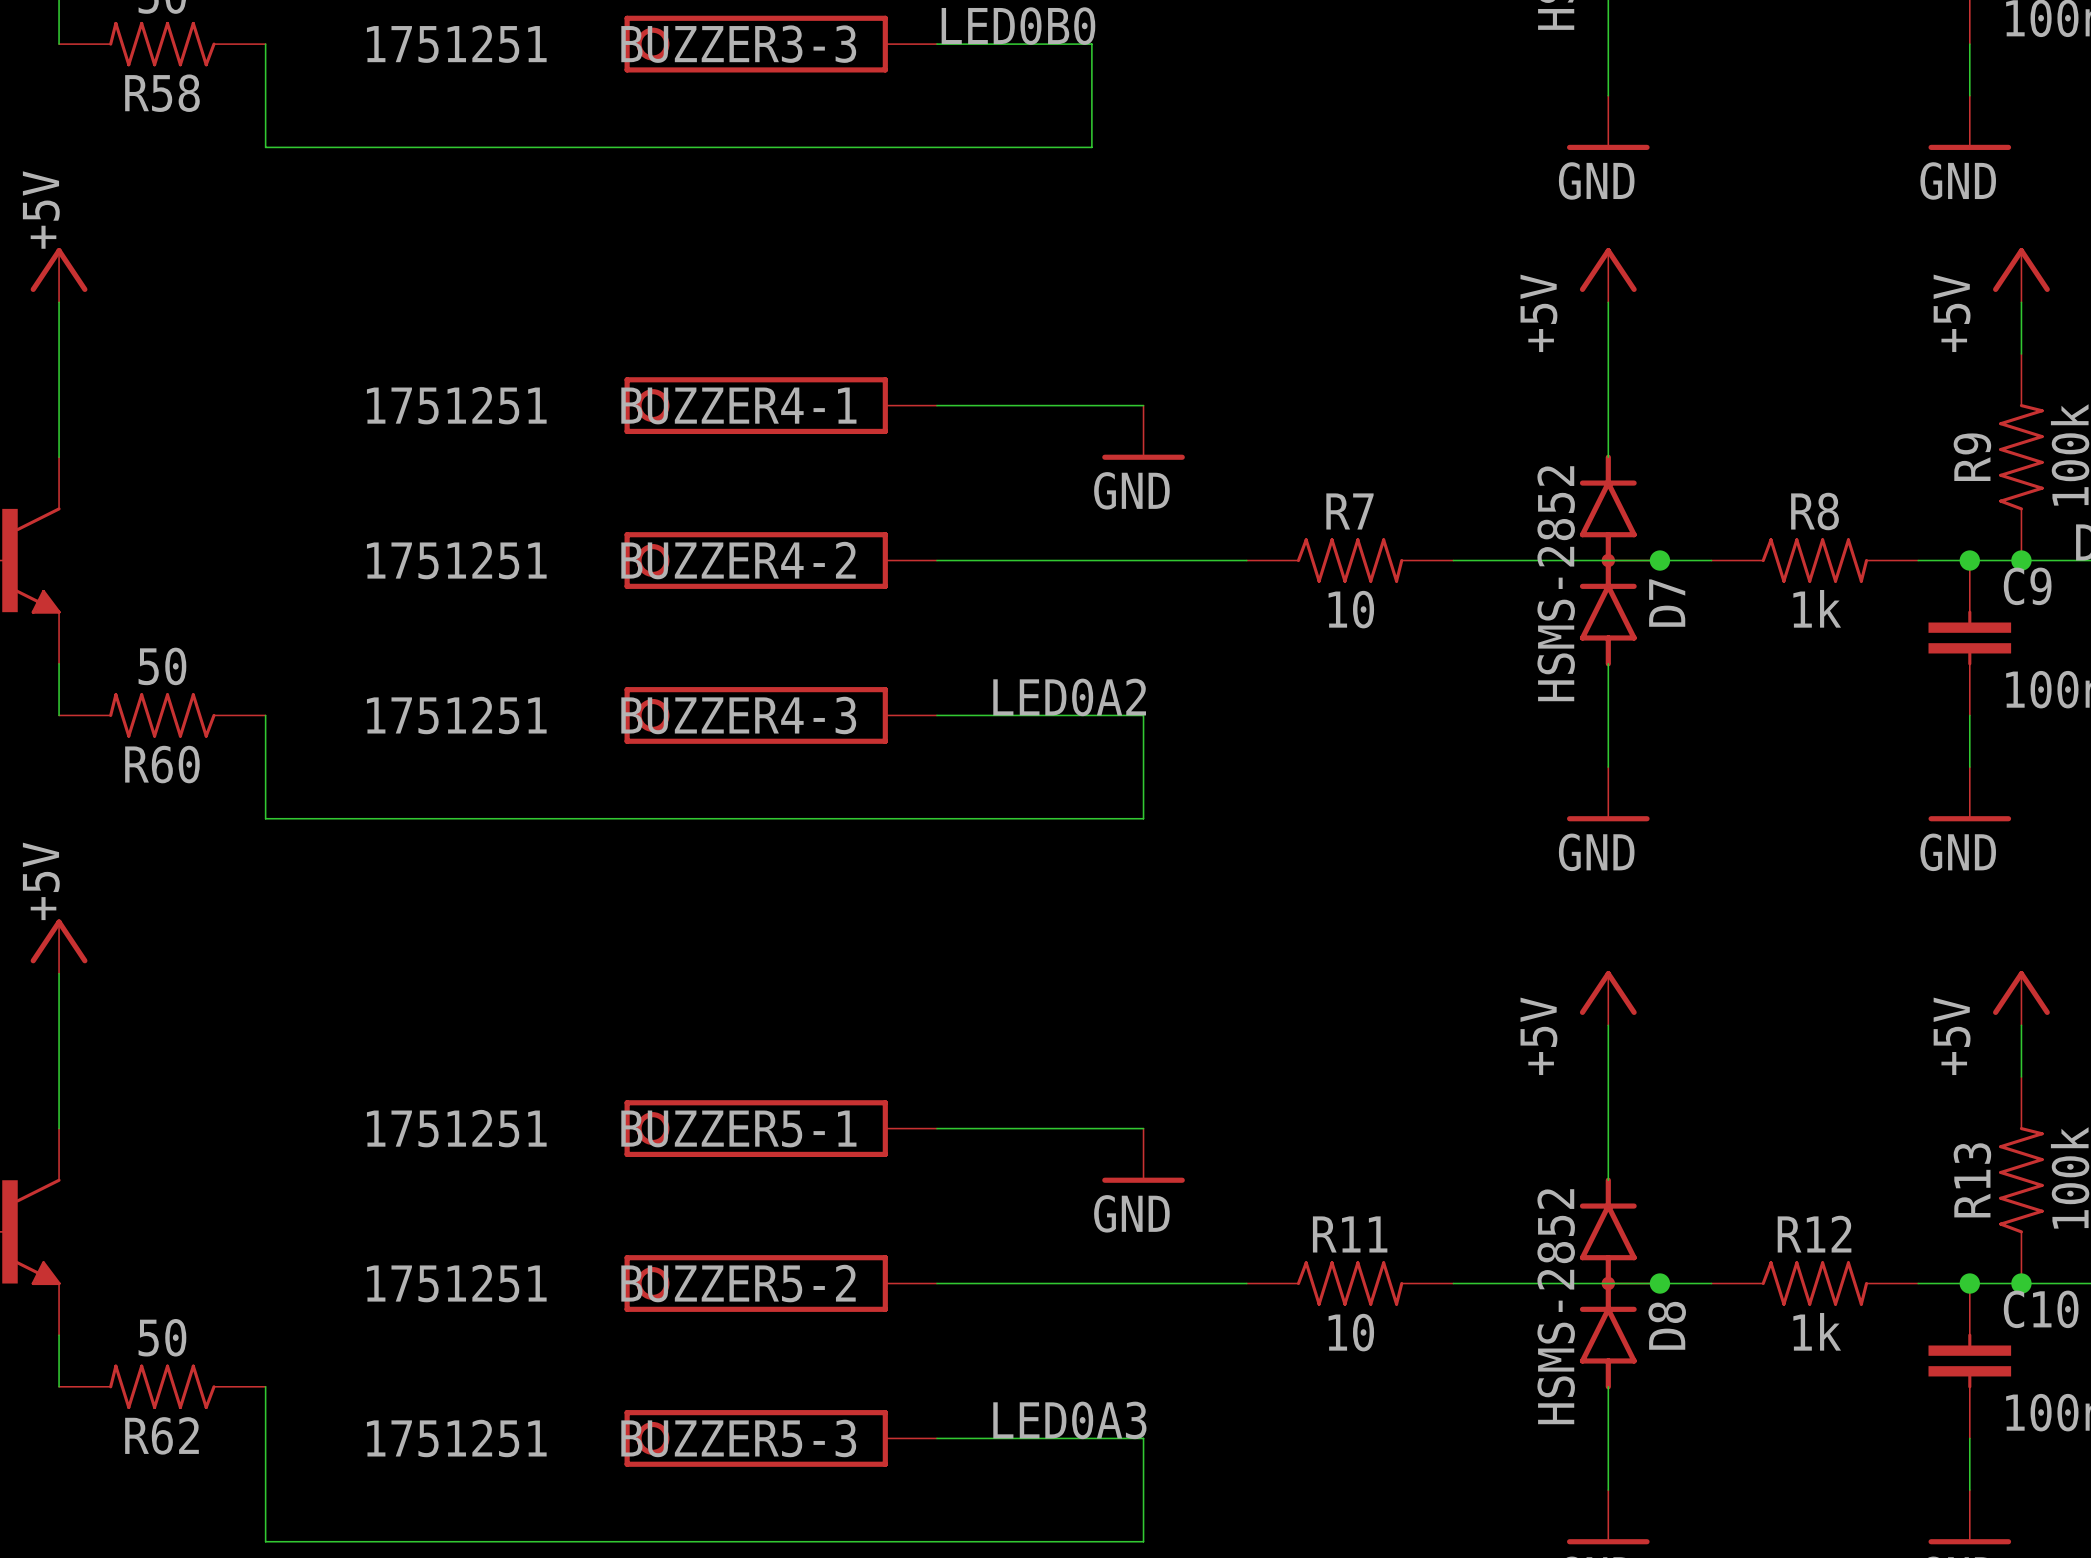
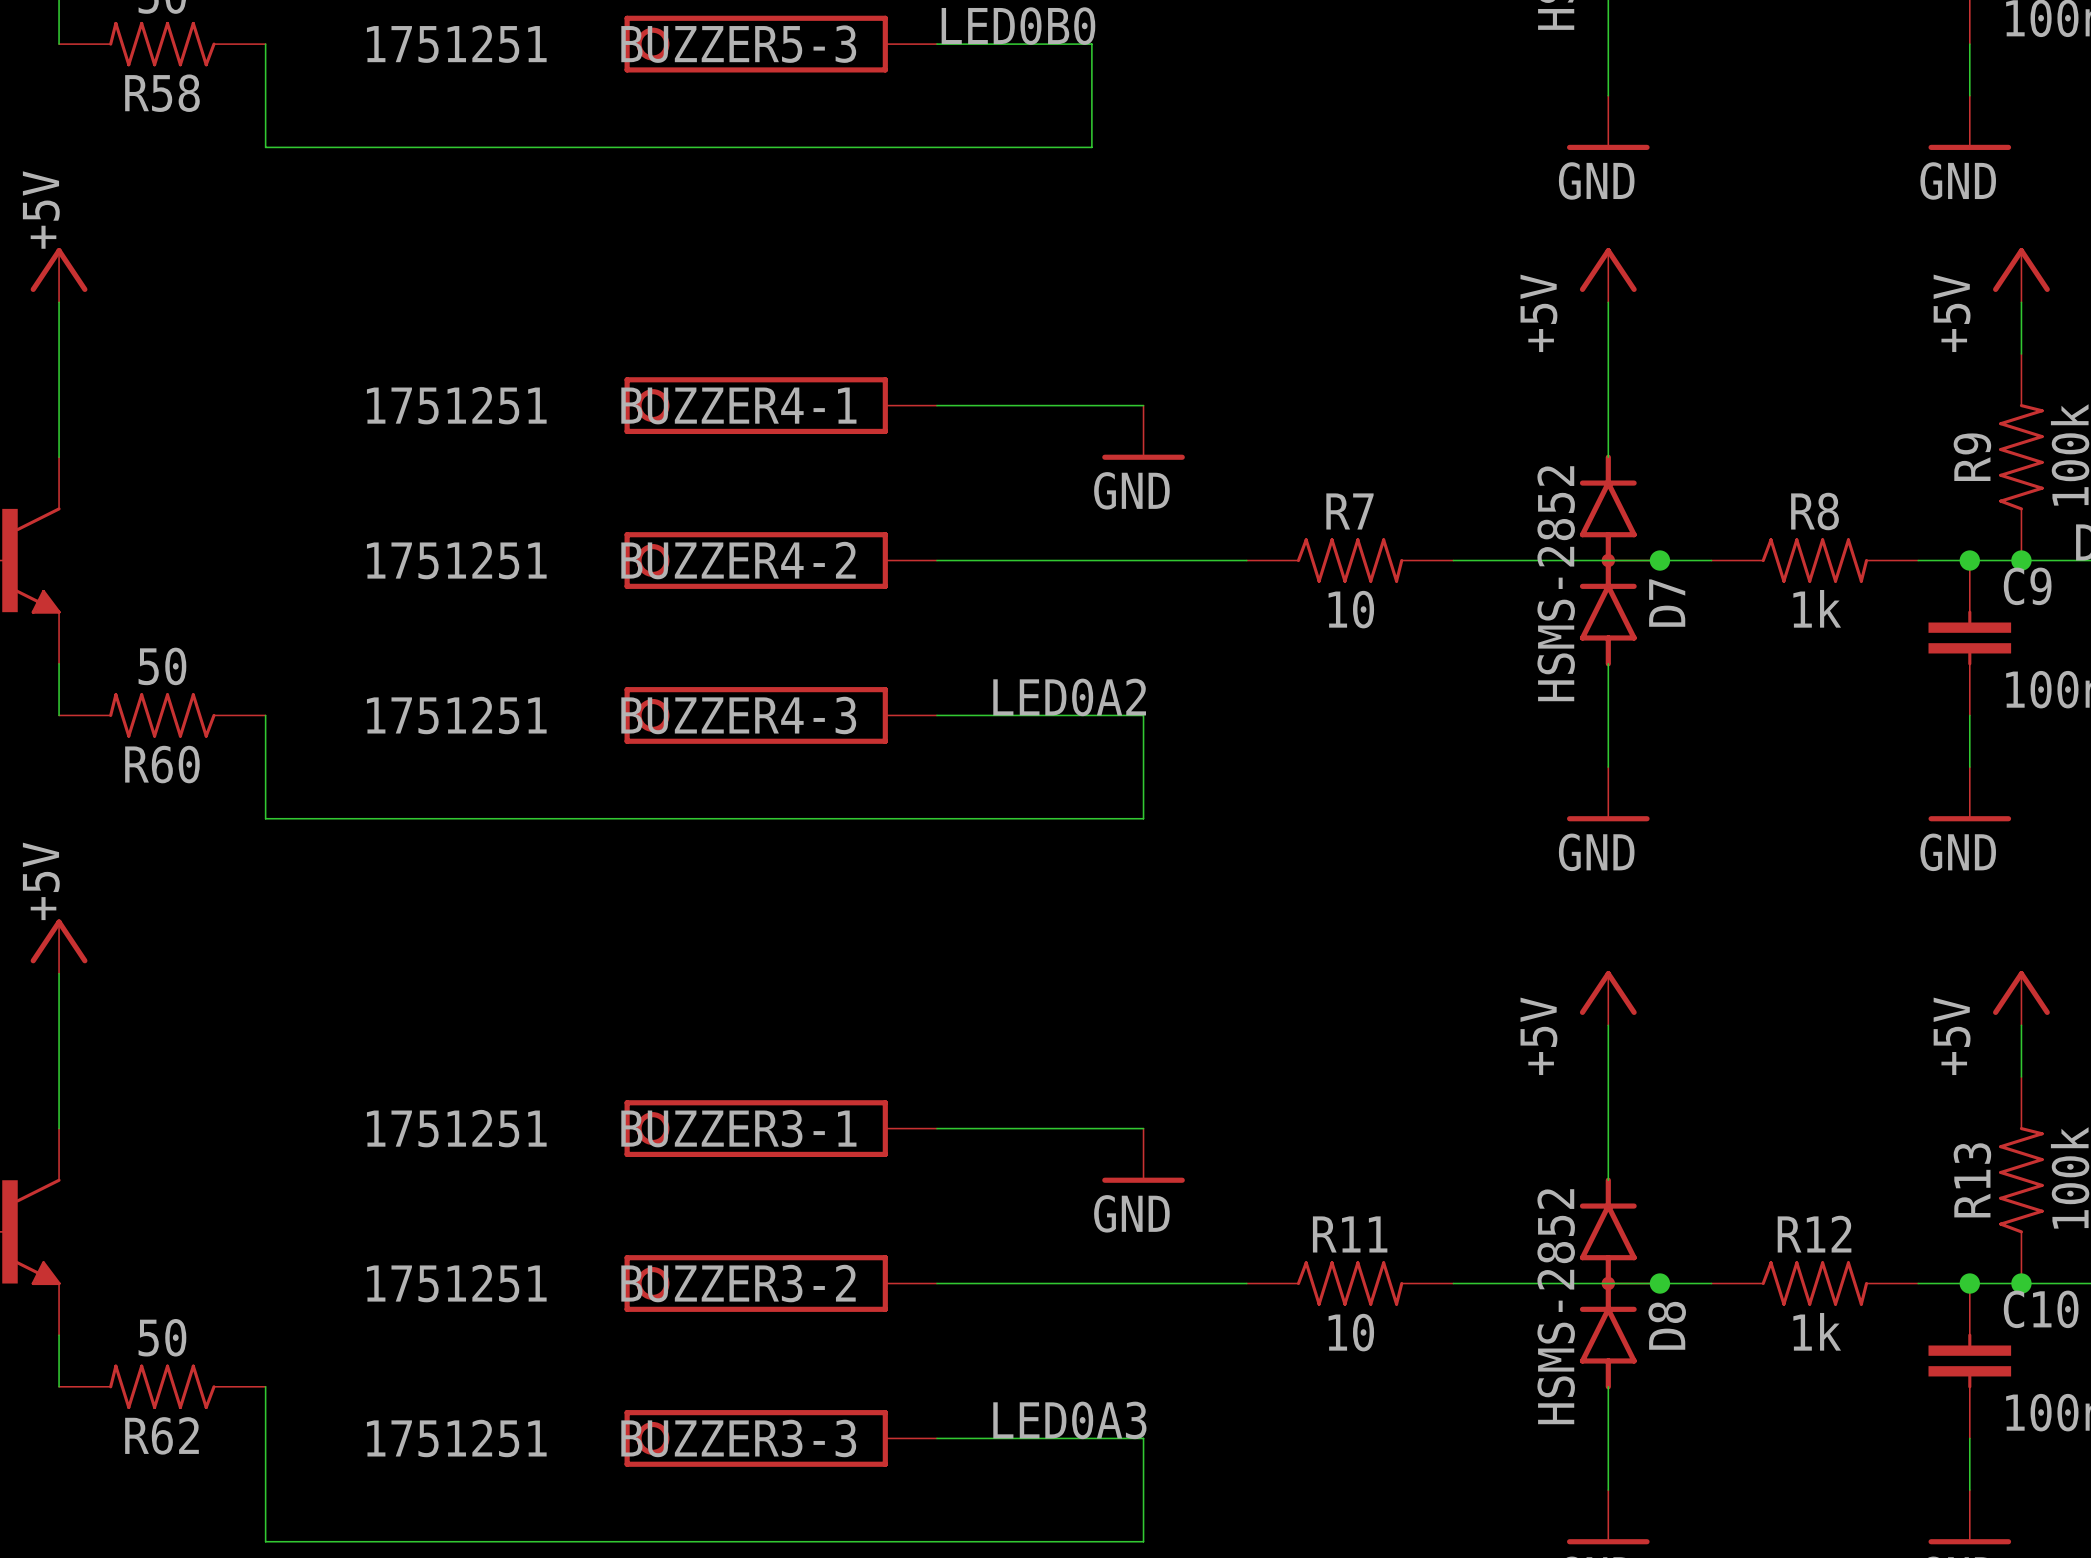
BUZZER3-3 name: BUZZER3-3 (738, 44) -> BUZZER5-3 (738, 44)
BUZZER5-1 name: BUZZER5-1 (738, 1128) -> BUZZER3-1 (738, 1128)
BUZZER5-2 name: BUZZER5-2 (738, 1283) -> BUZZER3-2 (738, 1283)
BUZZER5-3 name: BUZZER5-3 (738, 1438) -> BUZZER3-3 (738, 1438)

